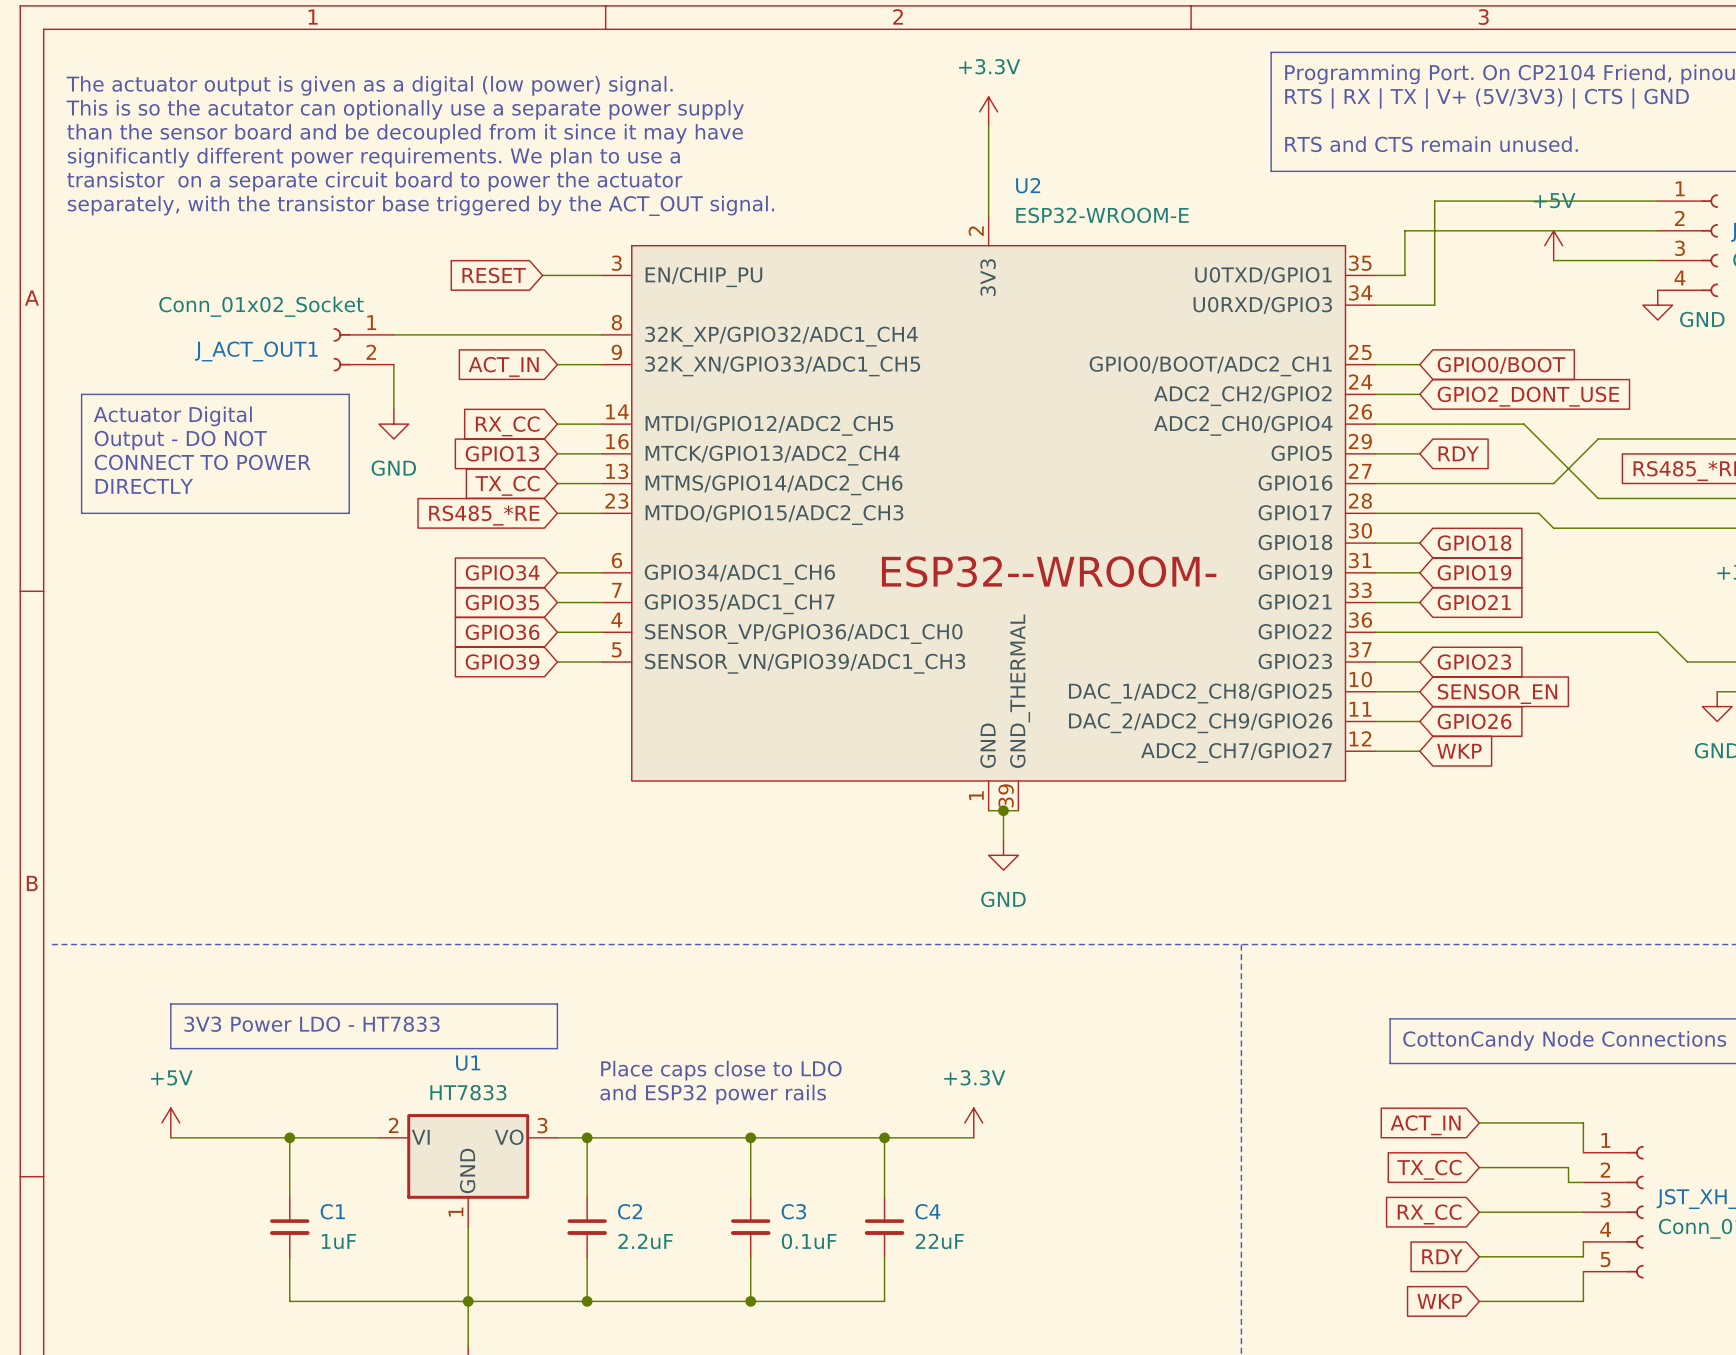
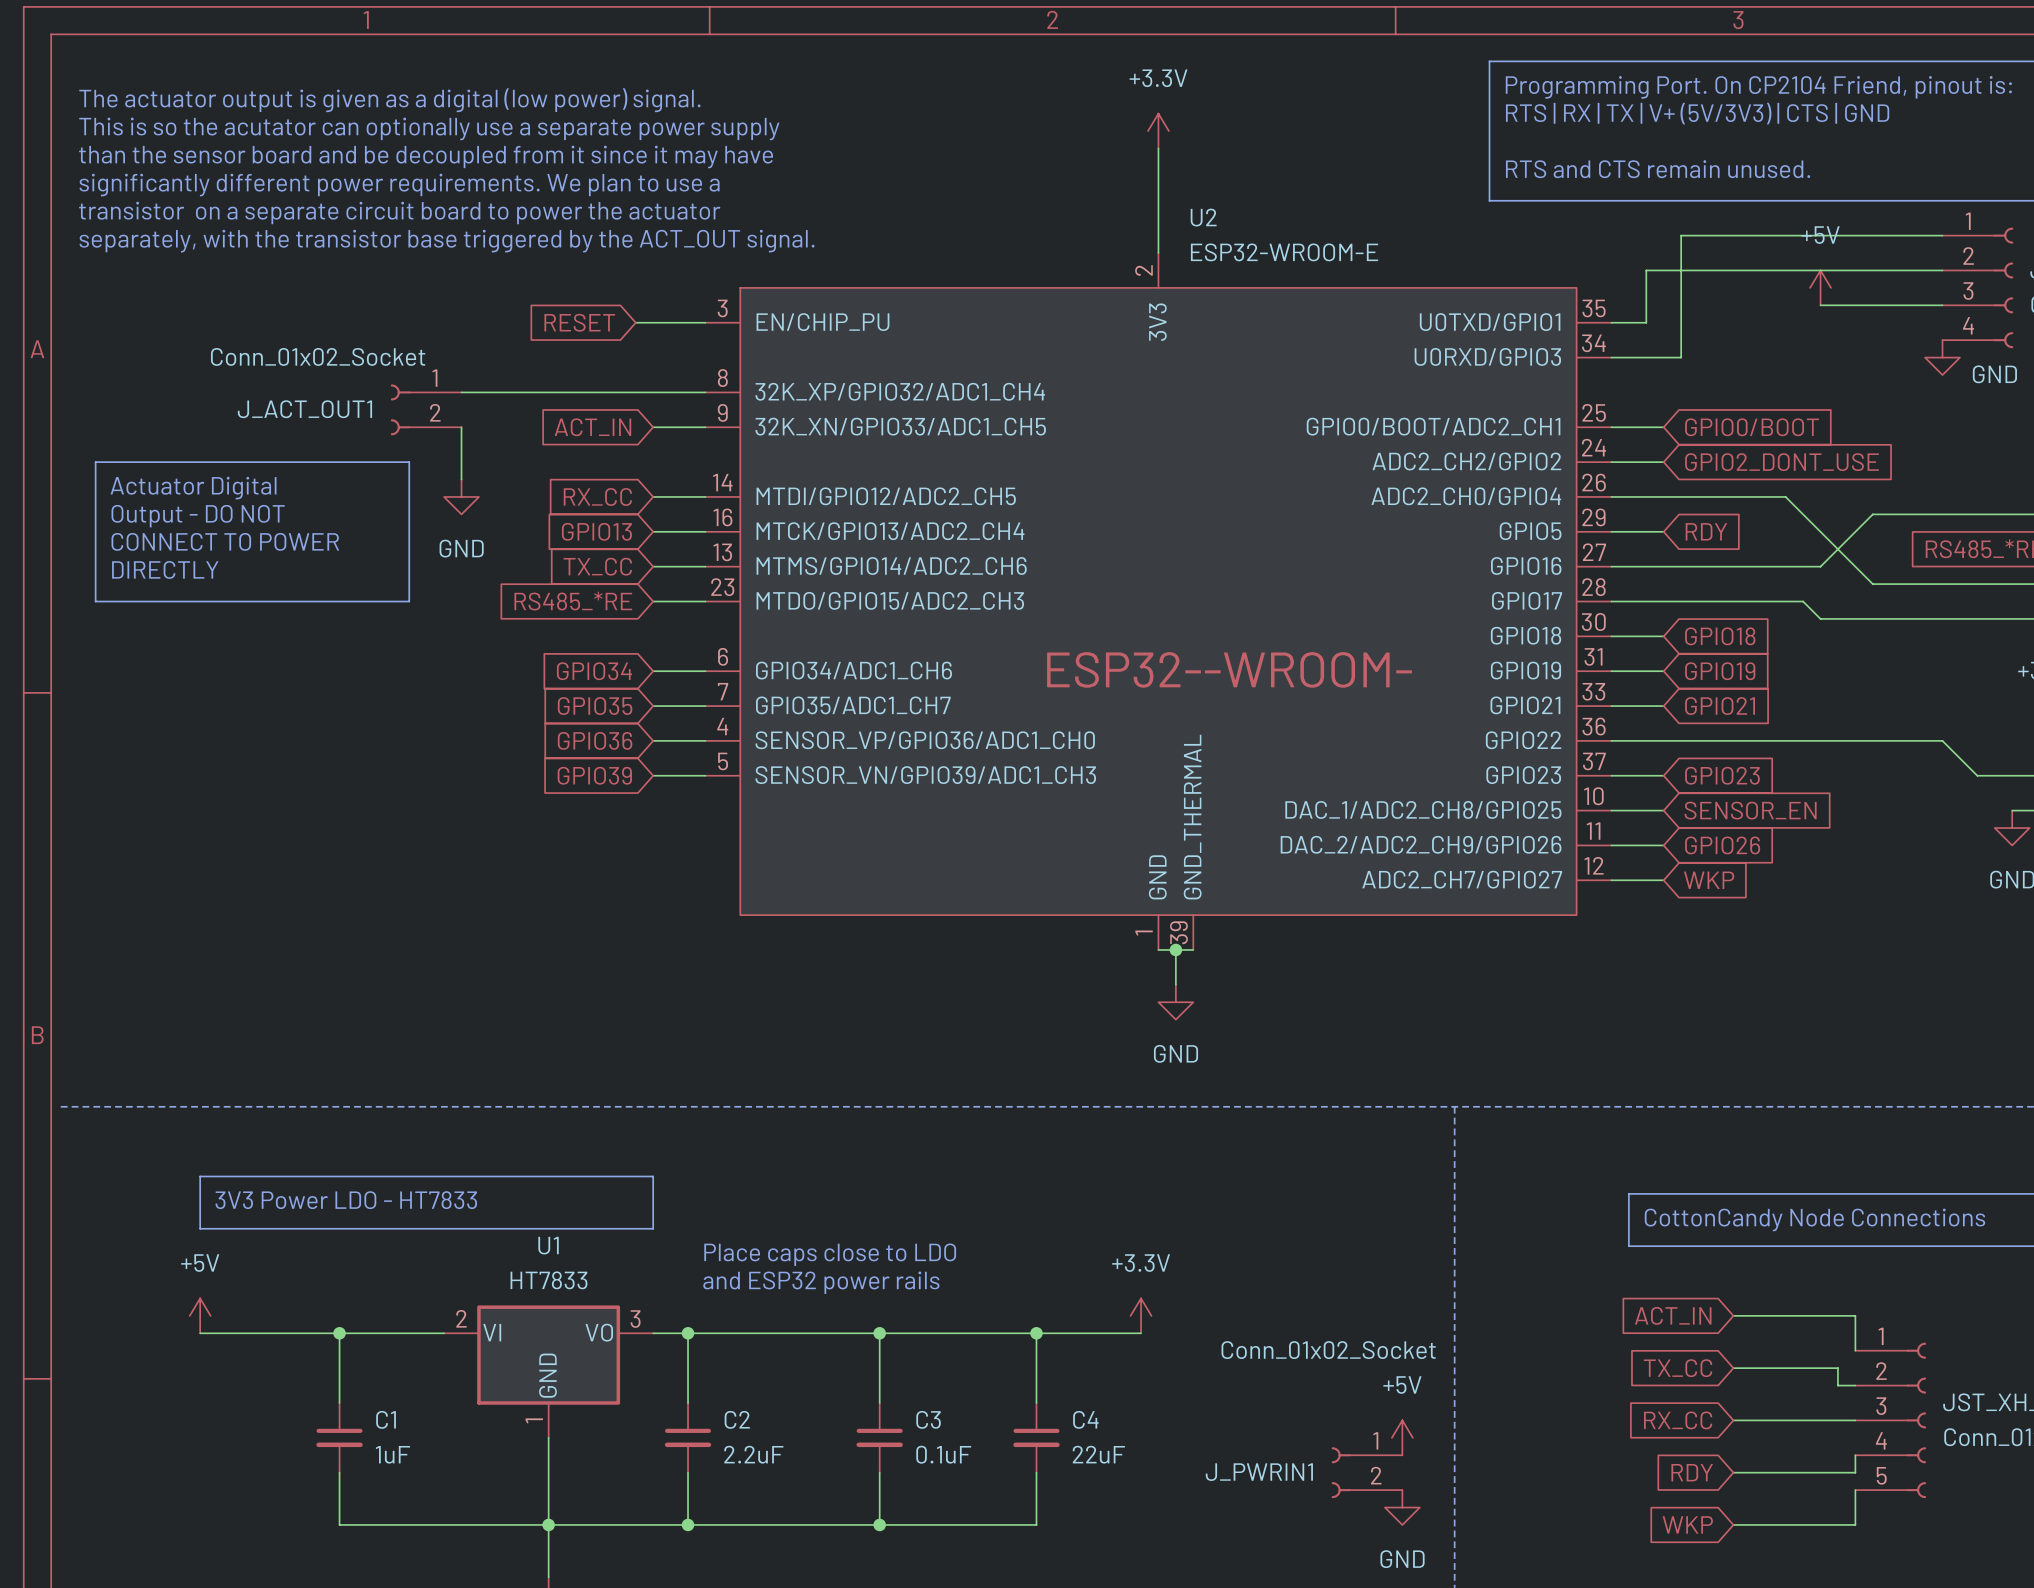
power symbol: none -> +5V (1402, 1437)
J_PWRIN1: none -> Conn_01x02_Socket (1367, 1472)
power symbol: none -> GND (1402, 1507)

